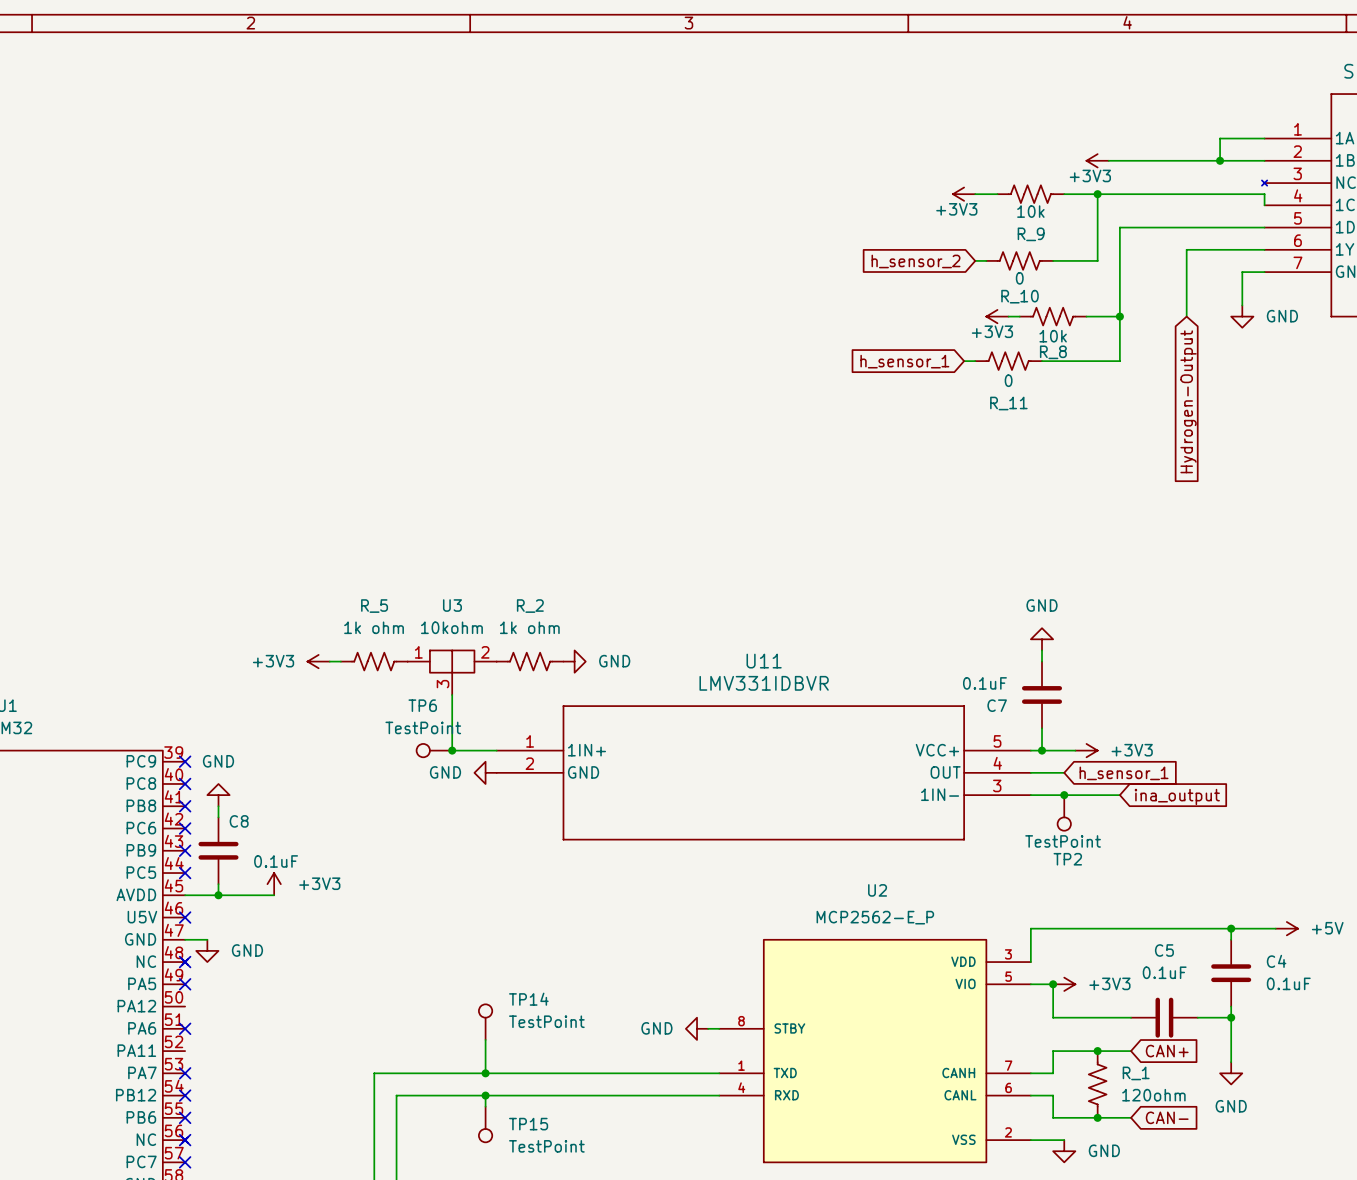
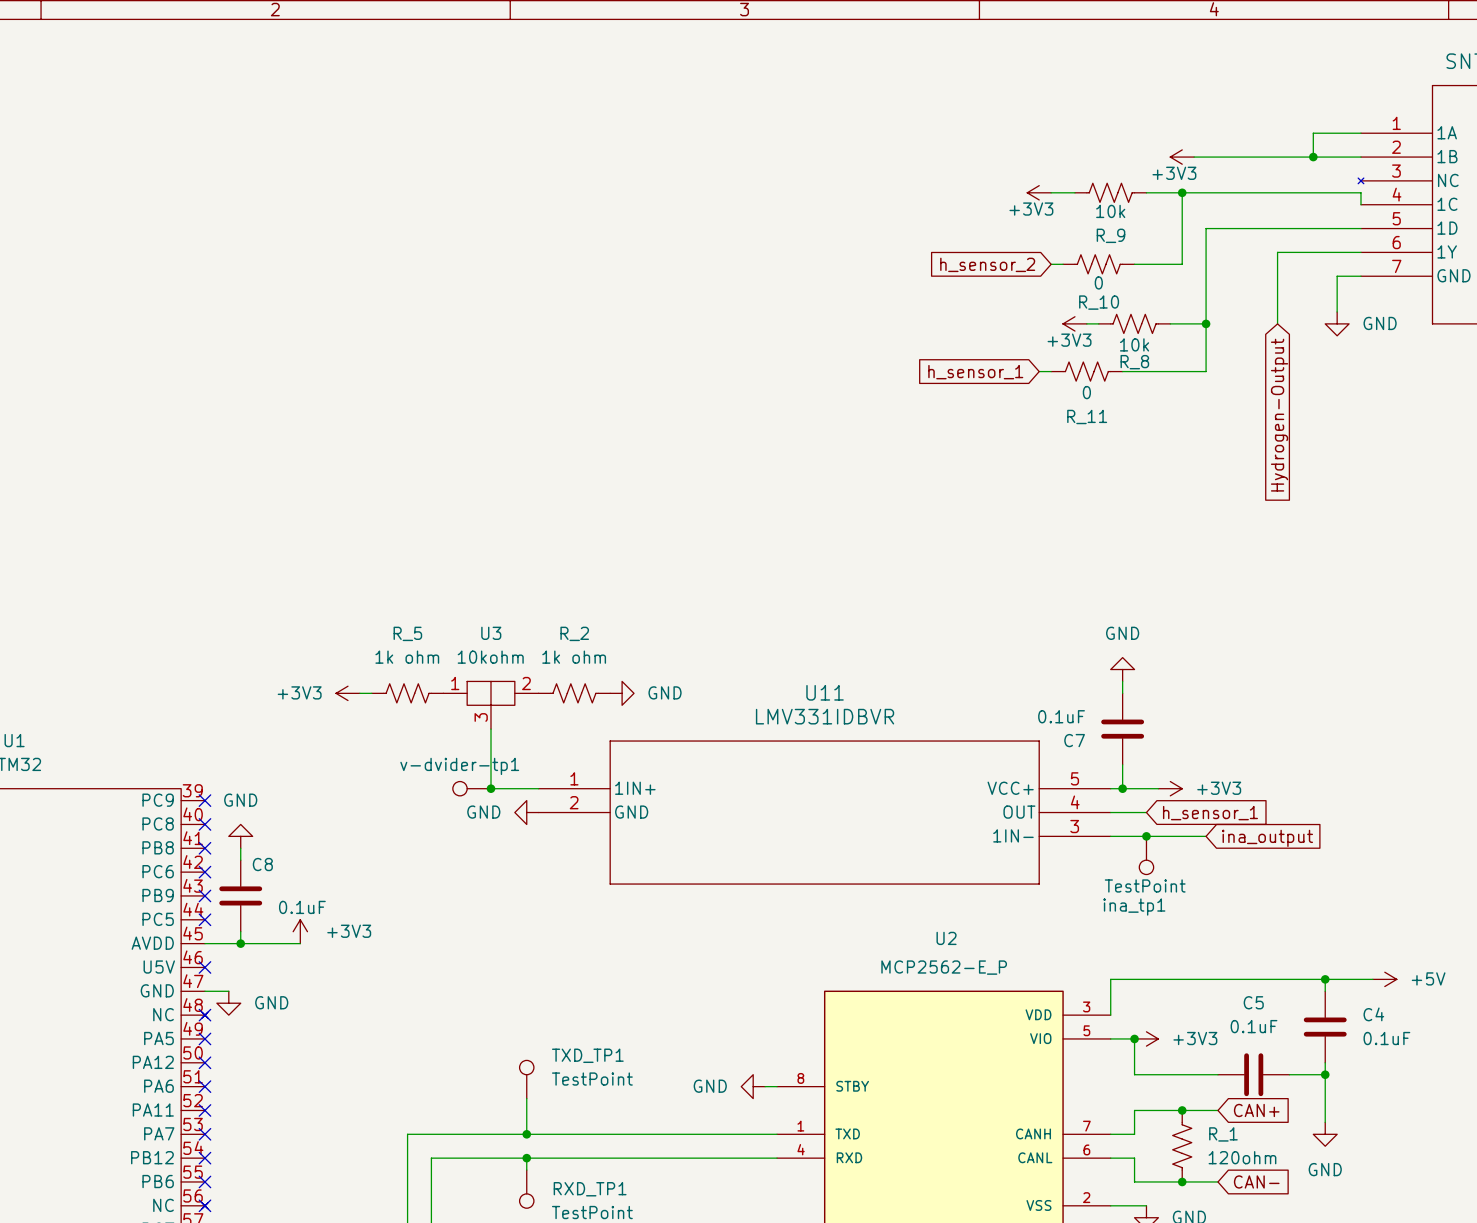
TP6 name: TP6 (422, 705) -> v-dvider-tp1 (459, 766)
TP6 value: TestPoint (423, 727) -> none
TP2 name: TP2 (1067, 859) -> ina_tp1 (1134, 907)
TP14 name: TP14 (528, 999) -> TXD_TP1 (587, 1055)
no-connect mark: none -> (204, 1062)
no-connect mark: none -> (204, 1110)
TP15 name: TP15 (528, 1124) -> RXD_TP1 (590, 1189)

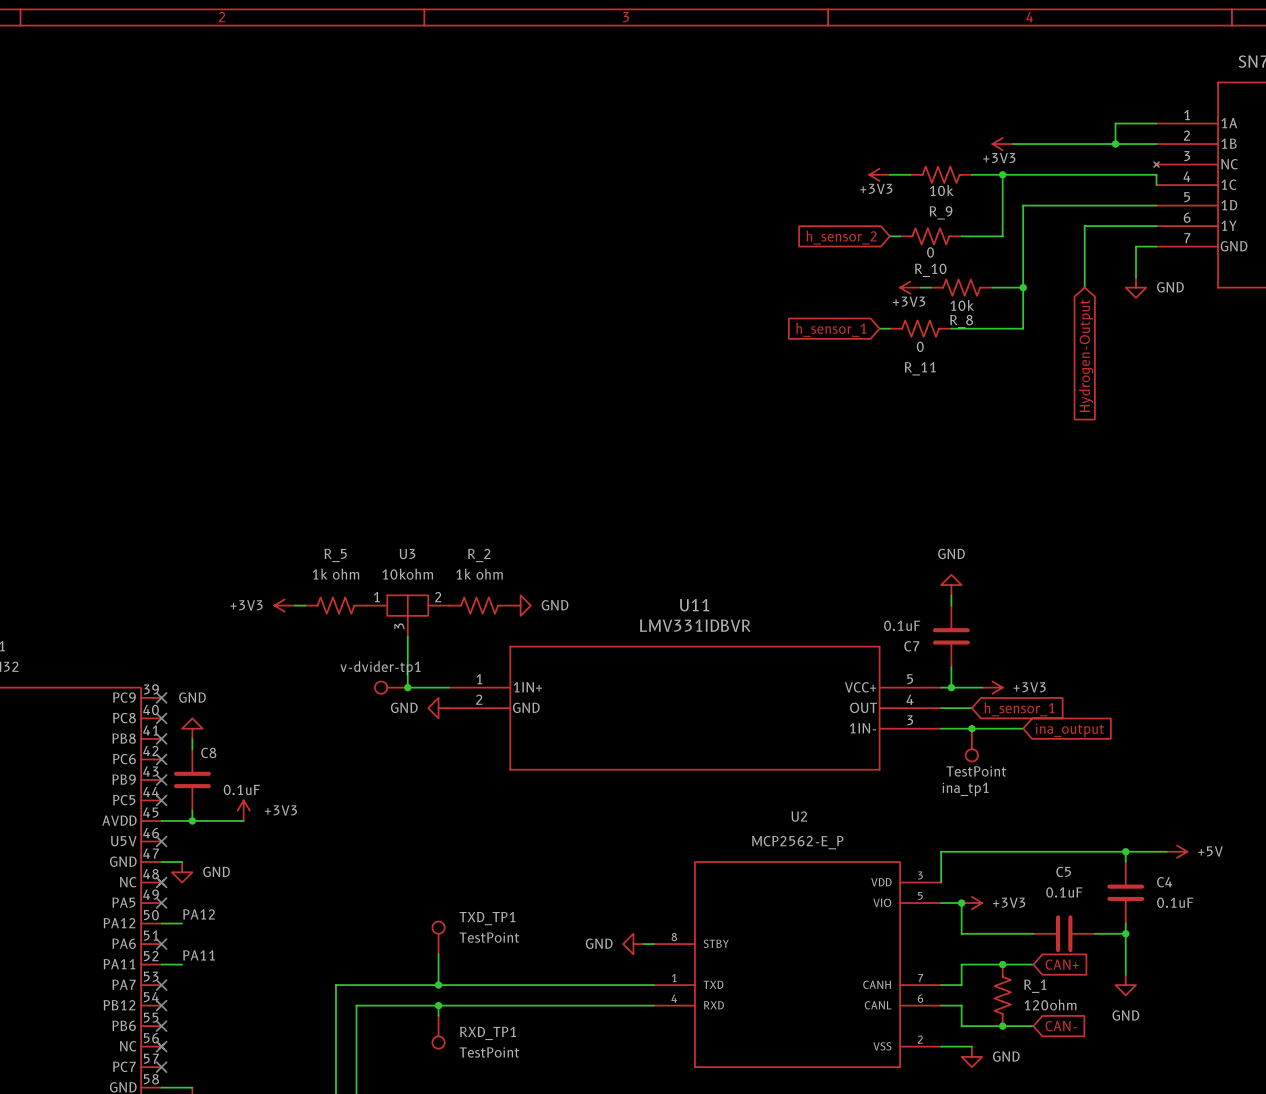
label: none -> PA12 (199, 914)
wire: none -> (161, 923) (182, 923)
no-connect mark: (204, 1062) -> none
label: none -> PA11 (199, 955)
wire: none -> (161, 964) (182, 964)
no-connect mark: (204, 1110) -> none

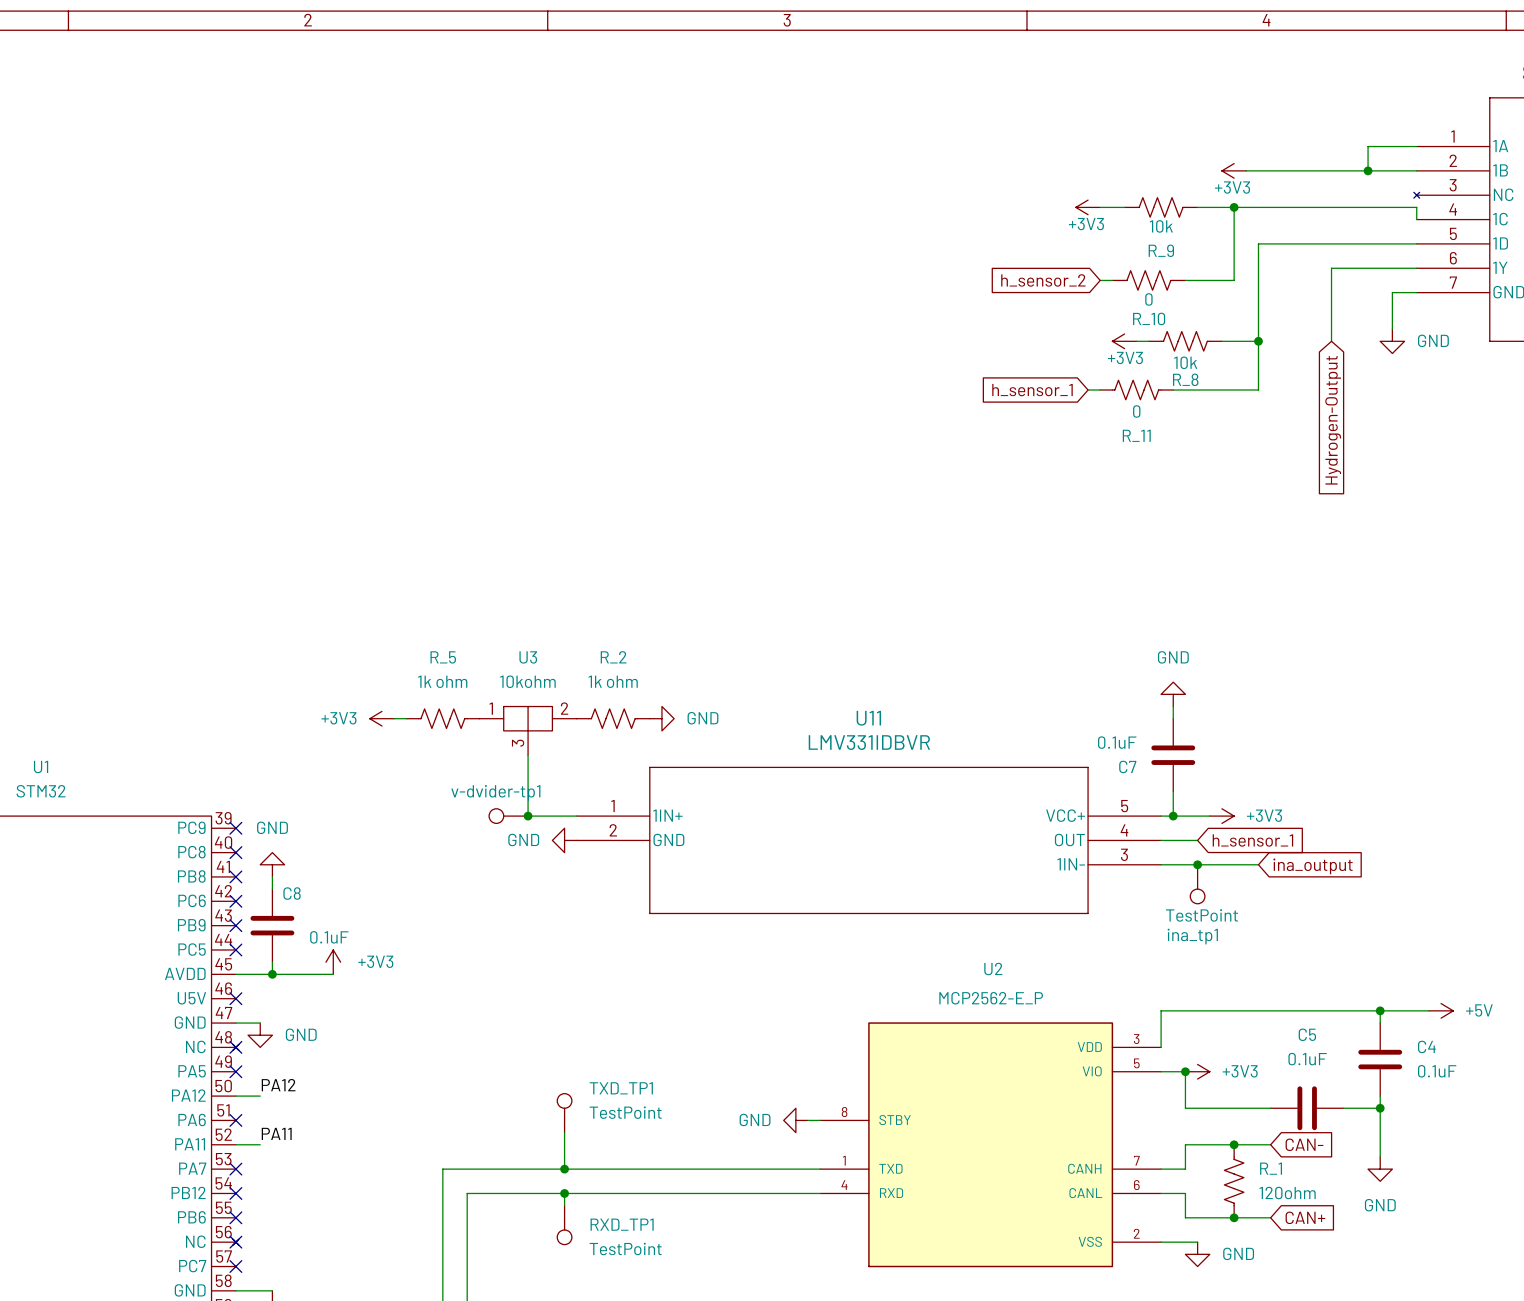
global label: CAN+ (1062, 964) -> CAN- (1304, 1144)
global label: CAN- (1061, 1026) -> CAN+ (1305, 1217)

